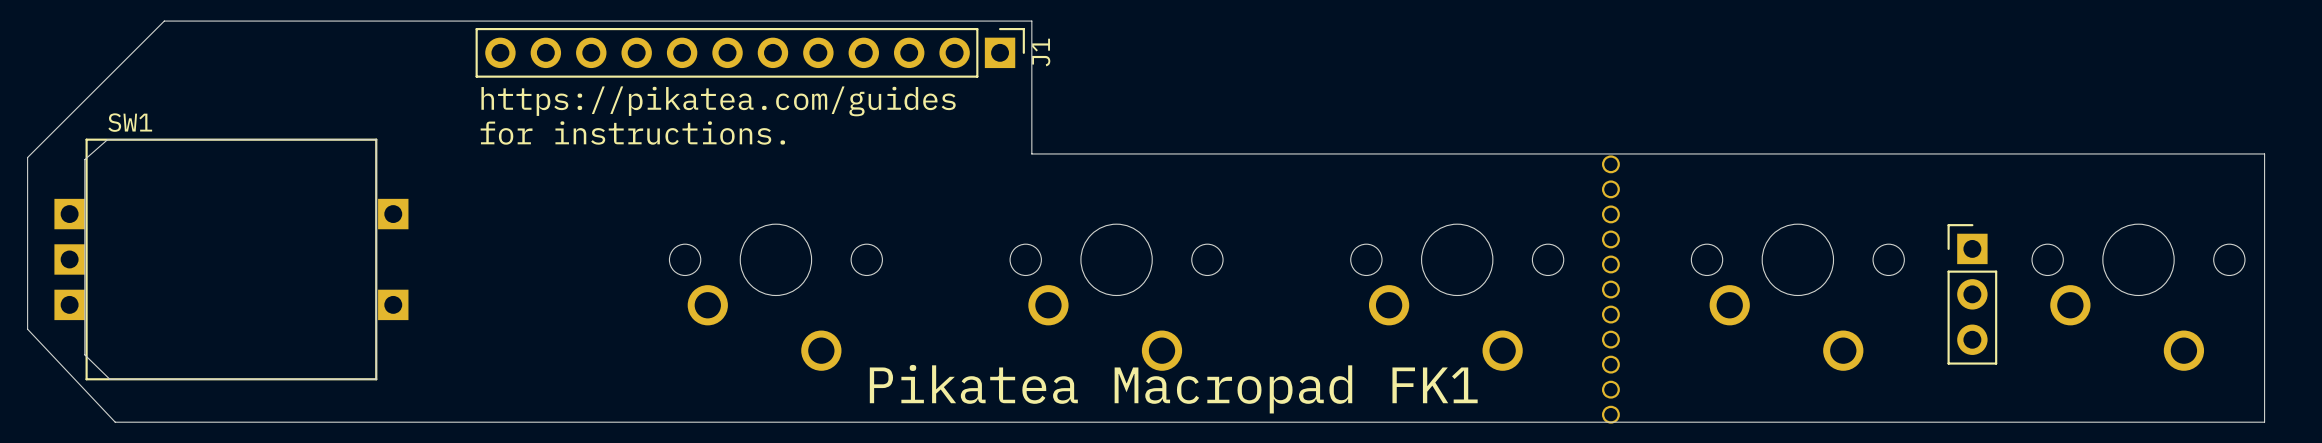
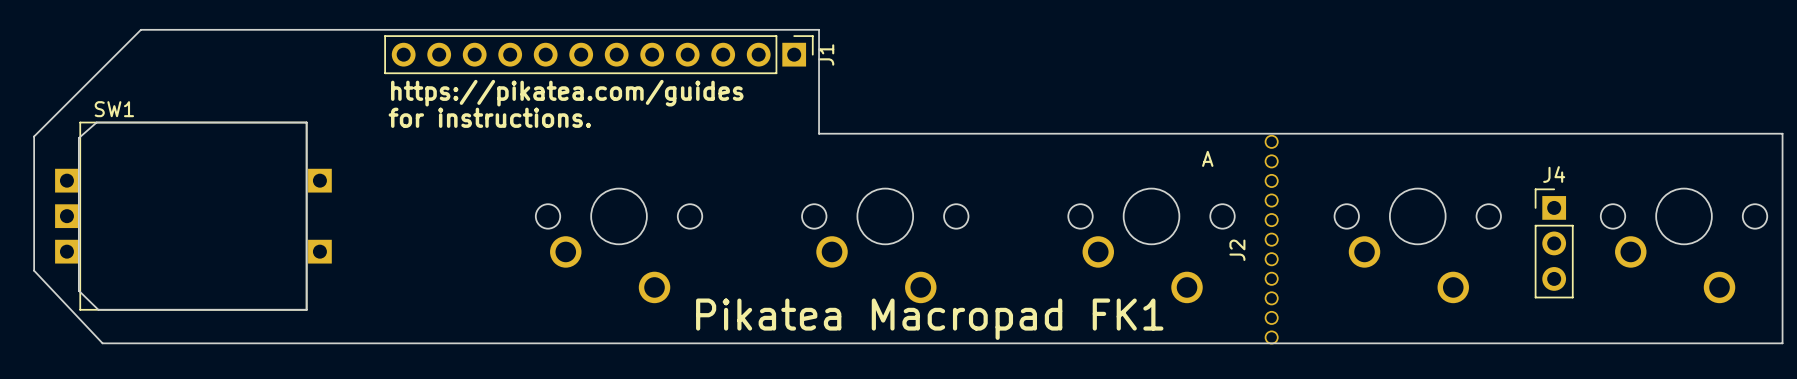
text: none -> A (1207, 158)
J4 name: none -> J4 (1554, 174)
J2 name: none -> J2 (1237, 250)

